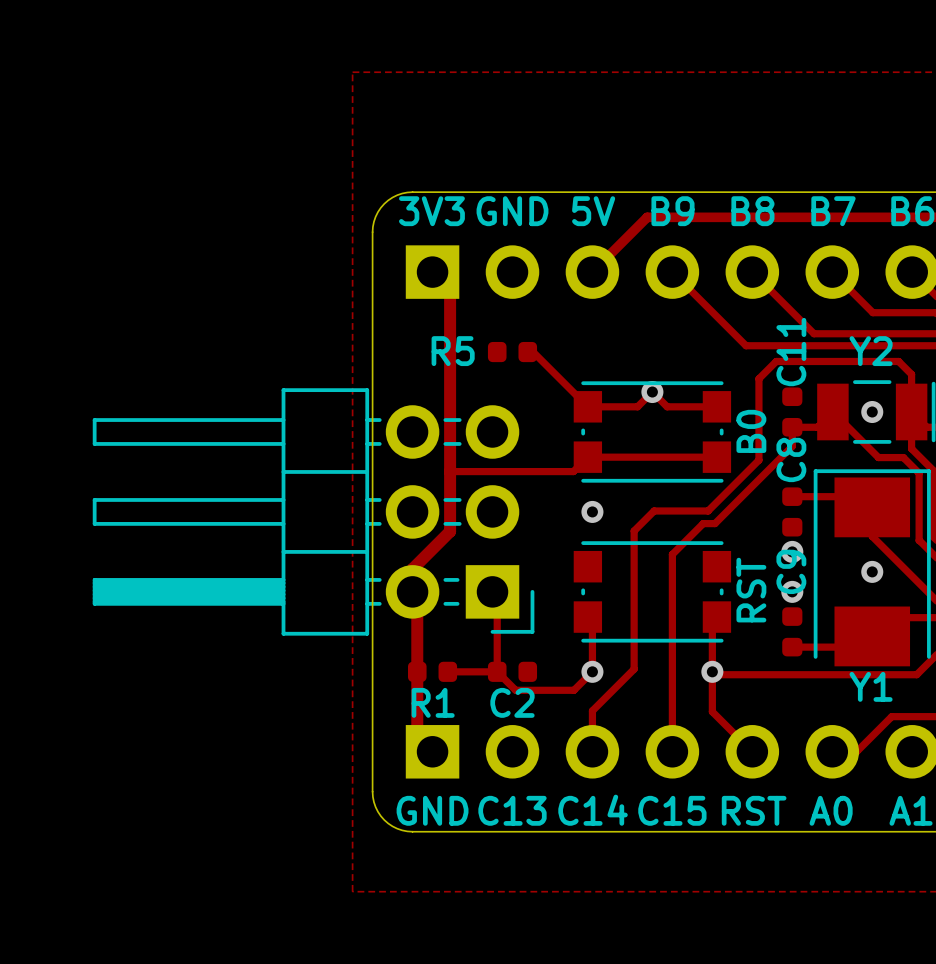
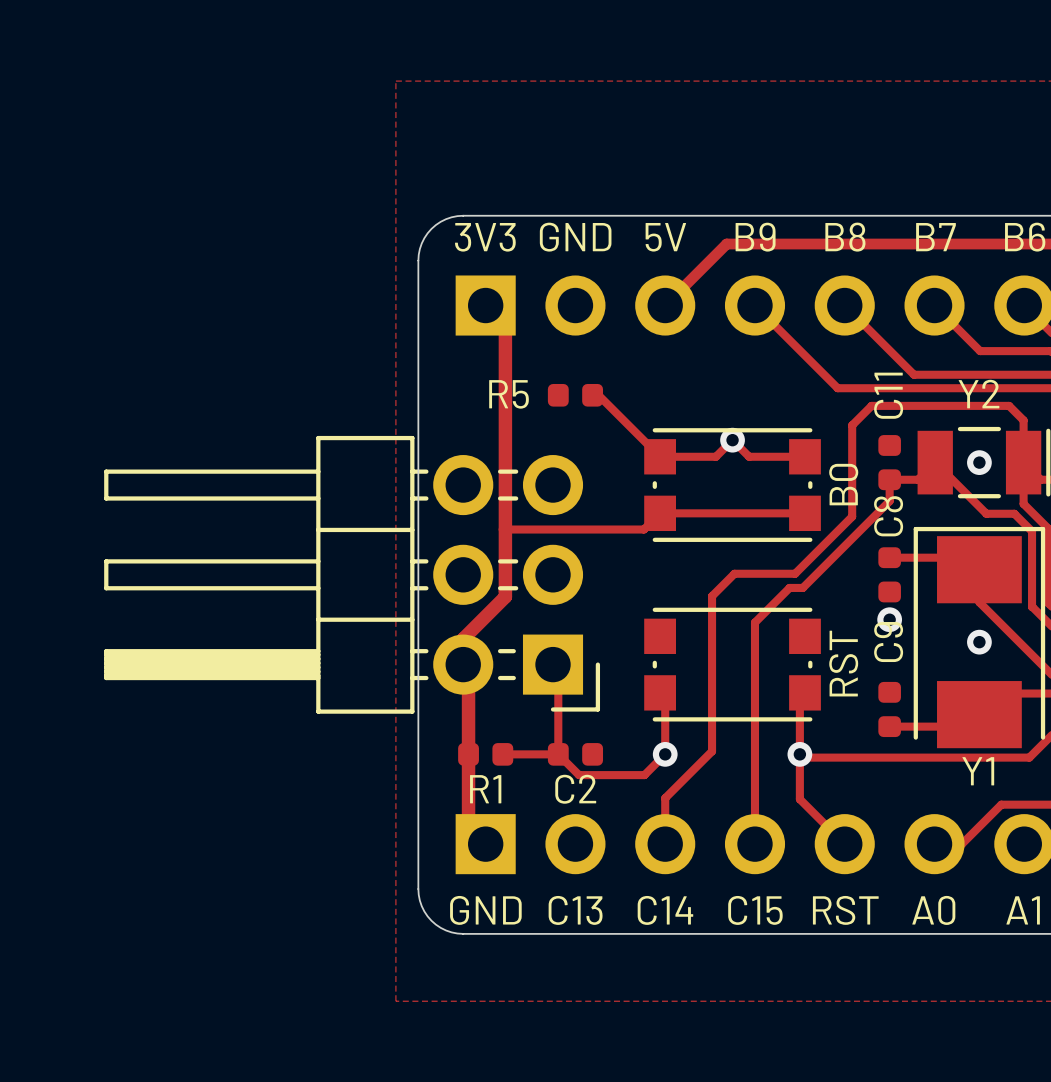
via: (592, 511) -> none
via: (792, 591) -> none

